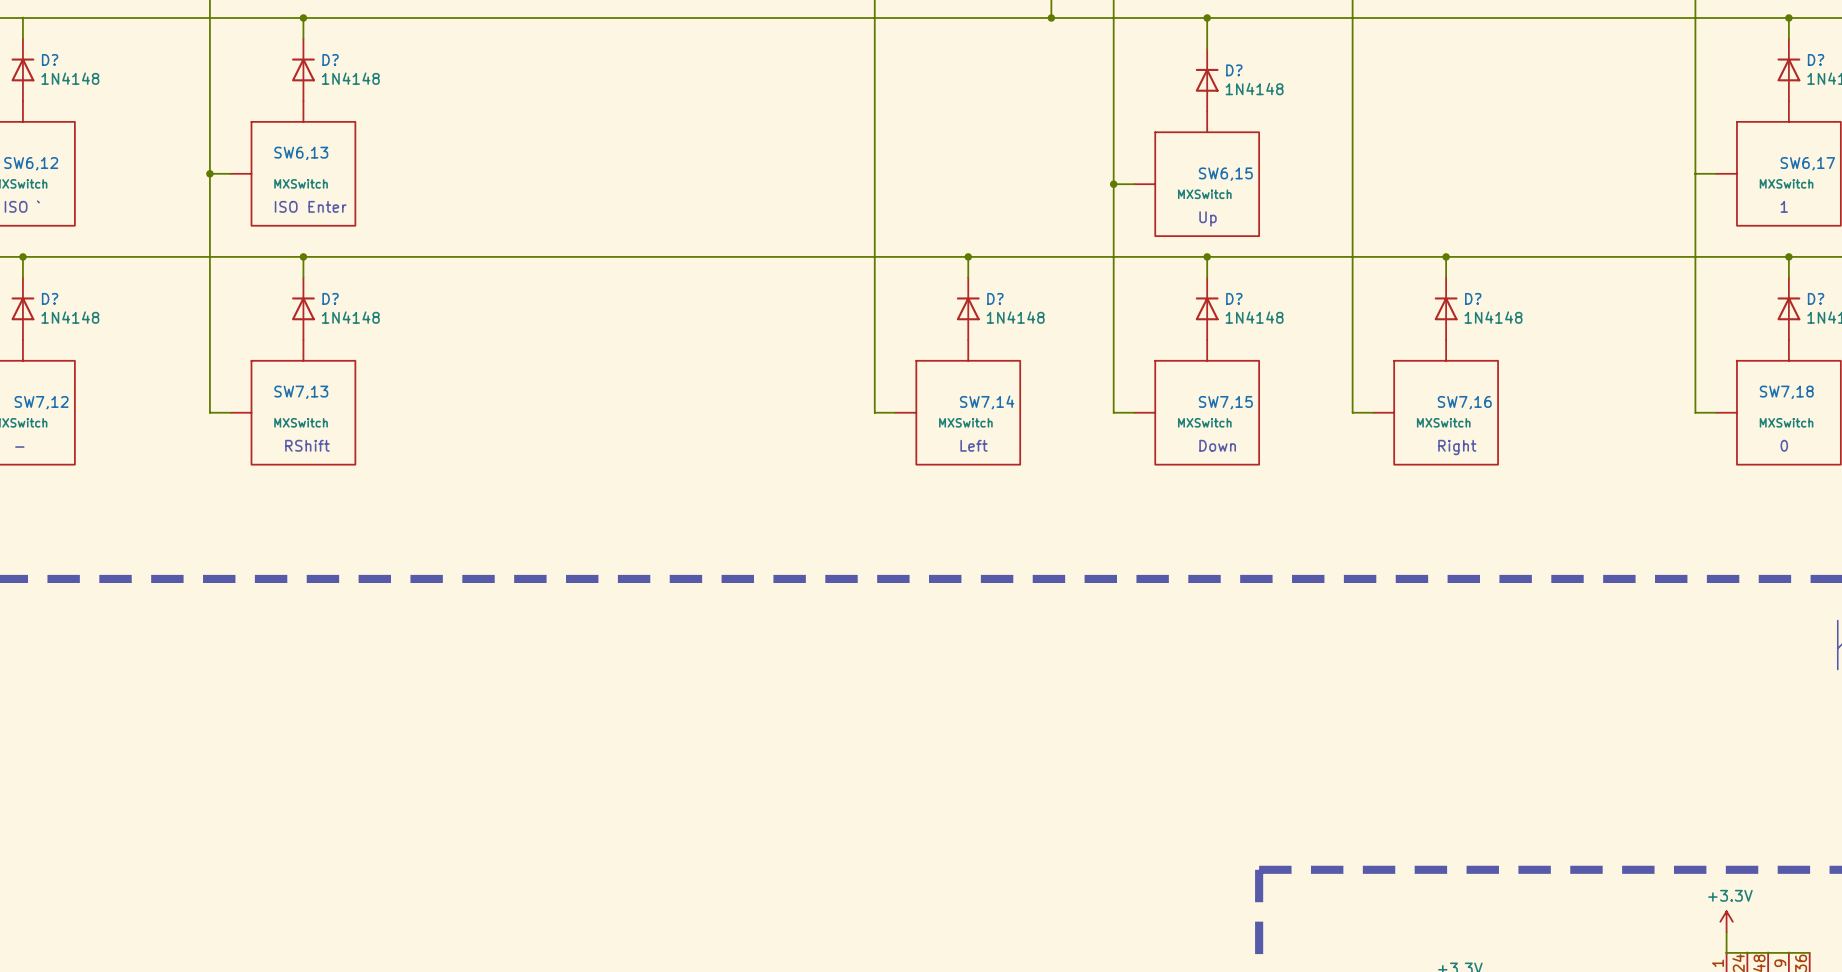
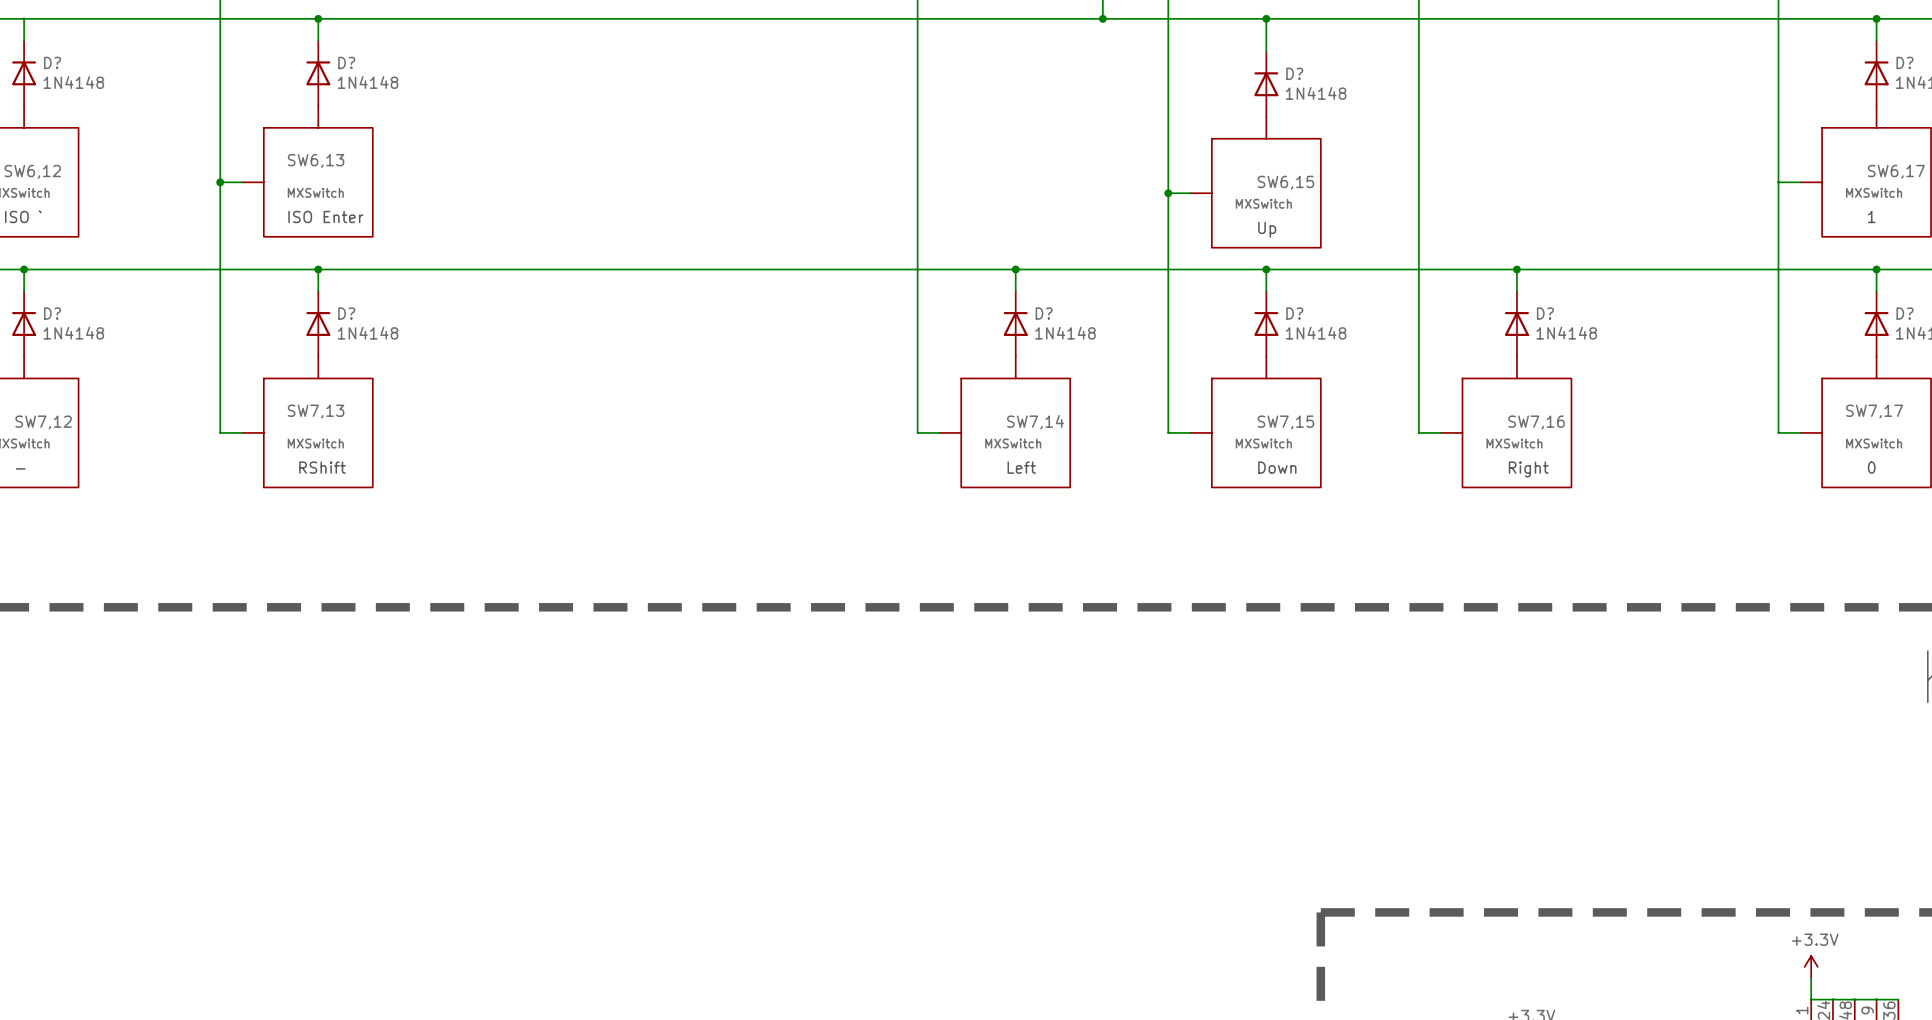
SW7,18 name: SW7,18 (1786, 392) -> SW7,17 (1874, 411)

